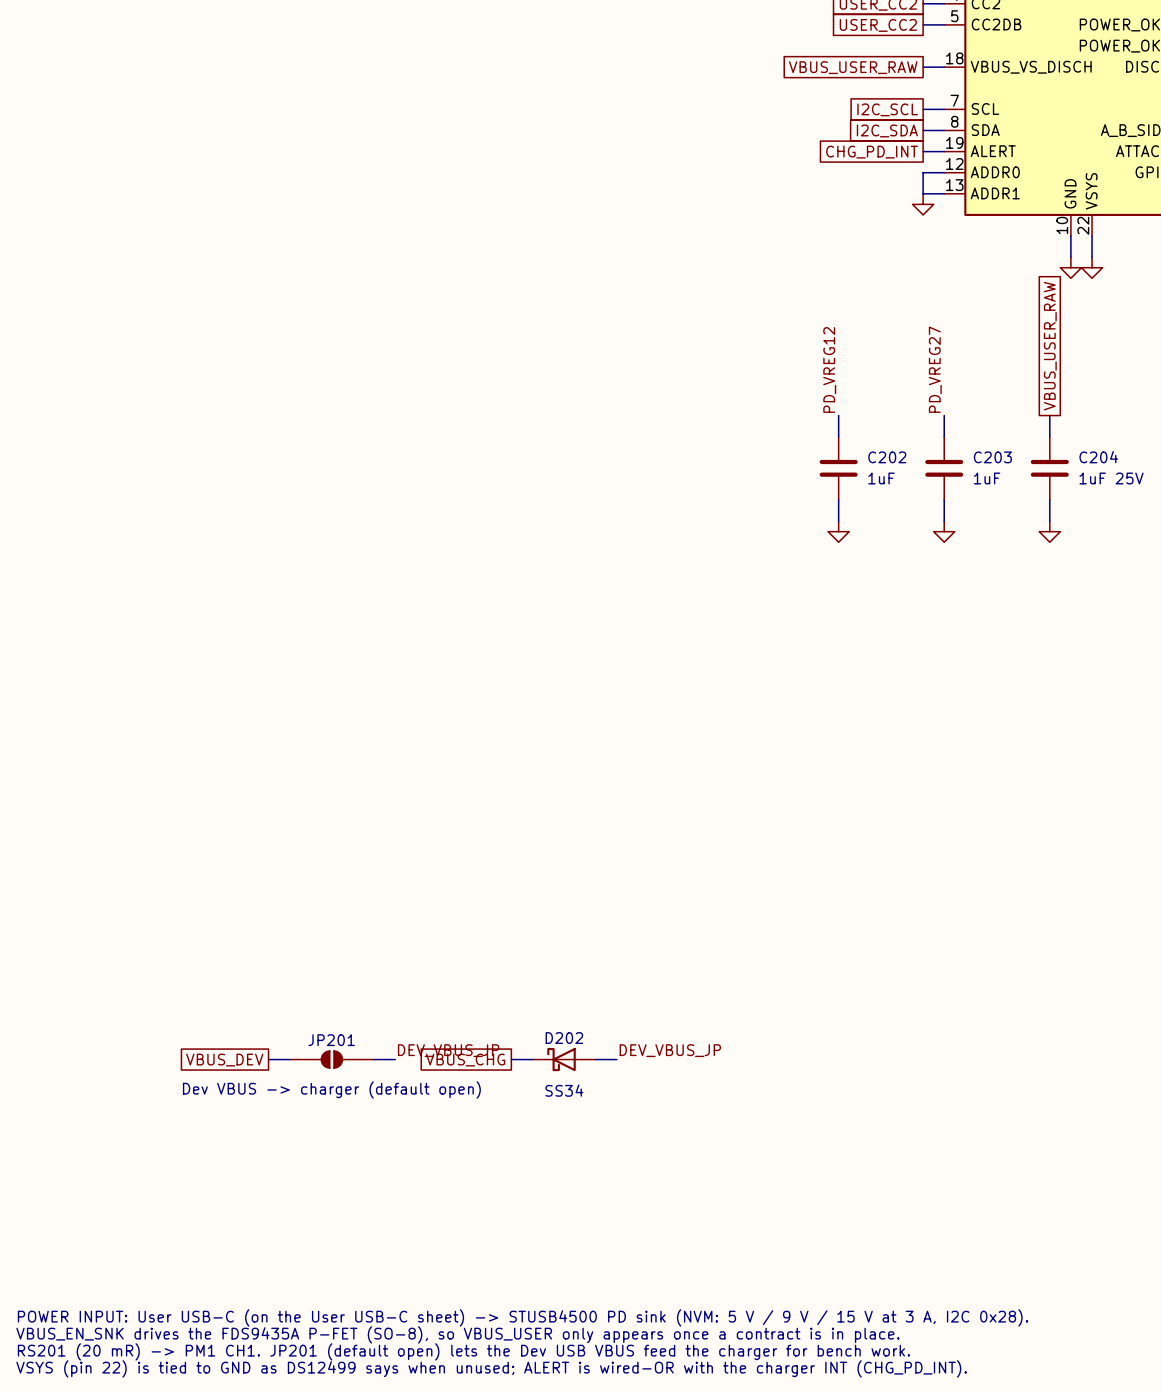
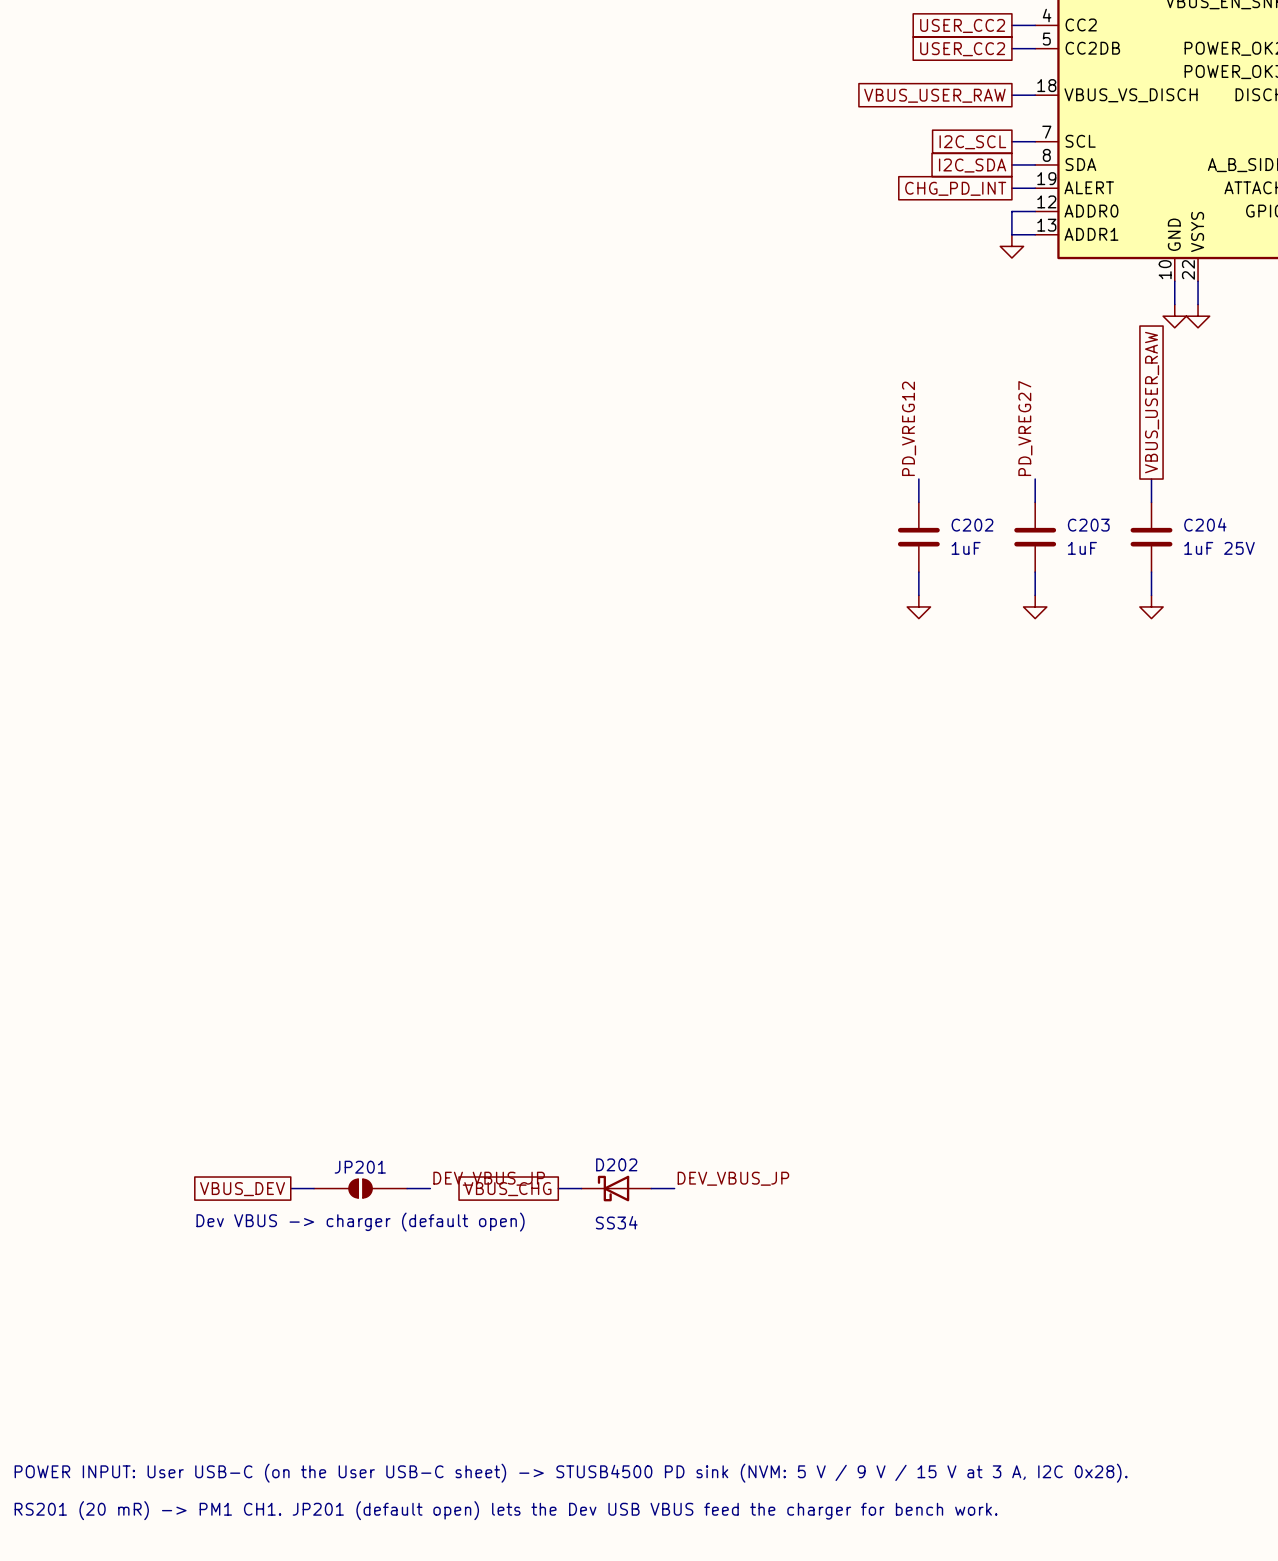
text: VBUS_EN_SNK drives the FDS9435A P-FET (SO-8), so VBUS_USER only appears once a contract is in place. (457, 1334) -> none
text: VSYS (pin 22) is tied to GND as DS12499 says when unused; ALERT is wired-OR with the charger INT (CHG_PD_INT). (491, 1368) -> none

